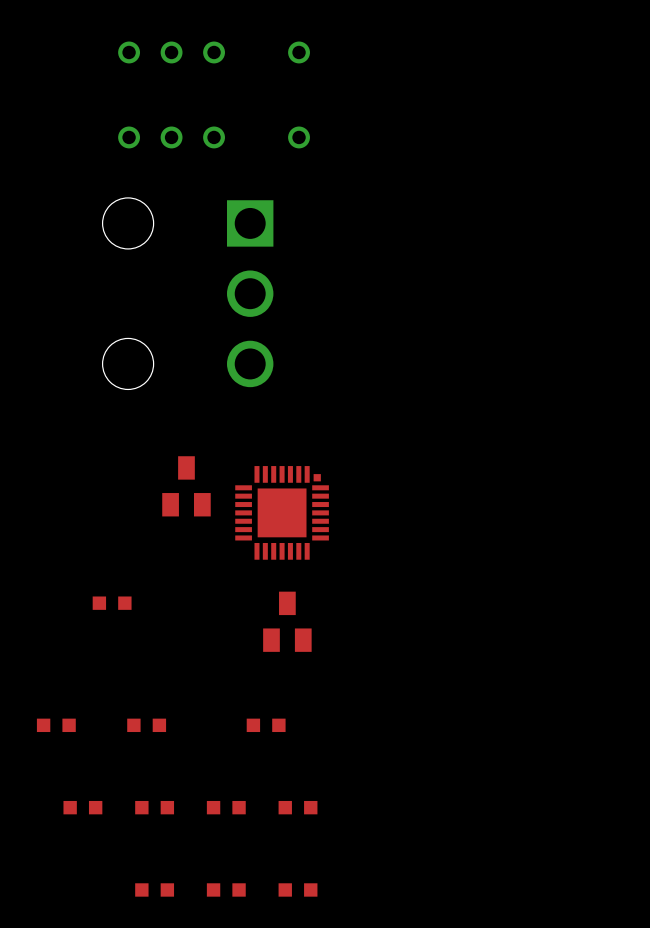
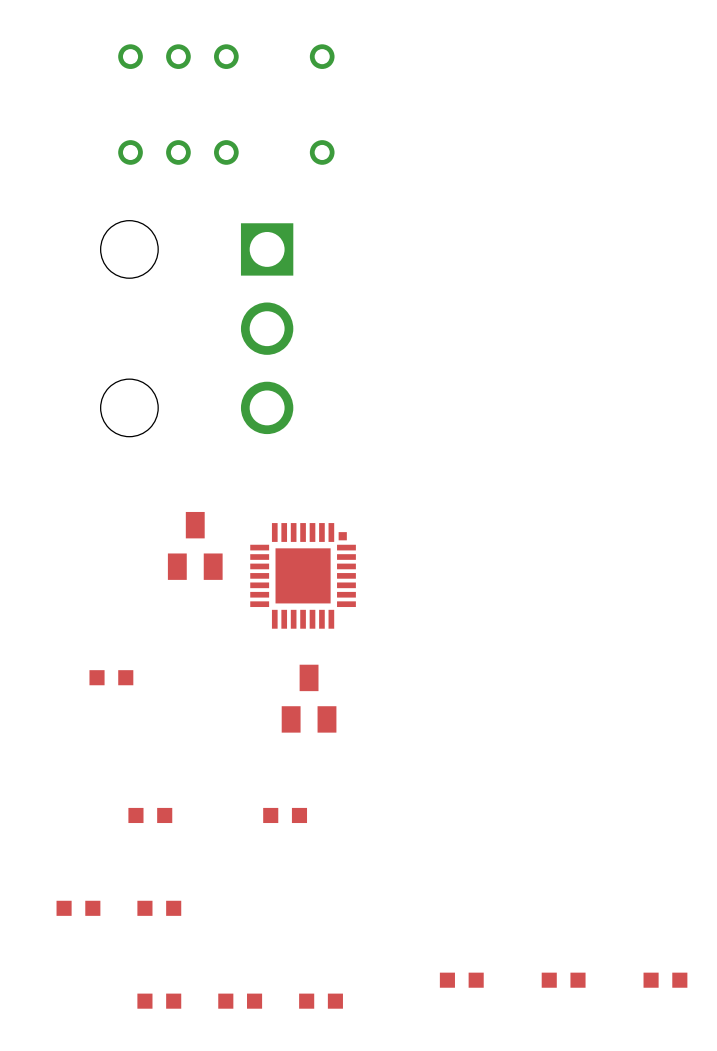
part: (56, 725) -> none
part: (226, 807) -> none
part: (298, 807) -> none
part: none -> (461, 980)
part: none -> (563, 980)
part: none -> (665, 980)

